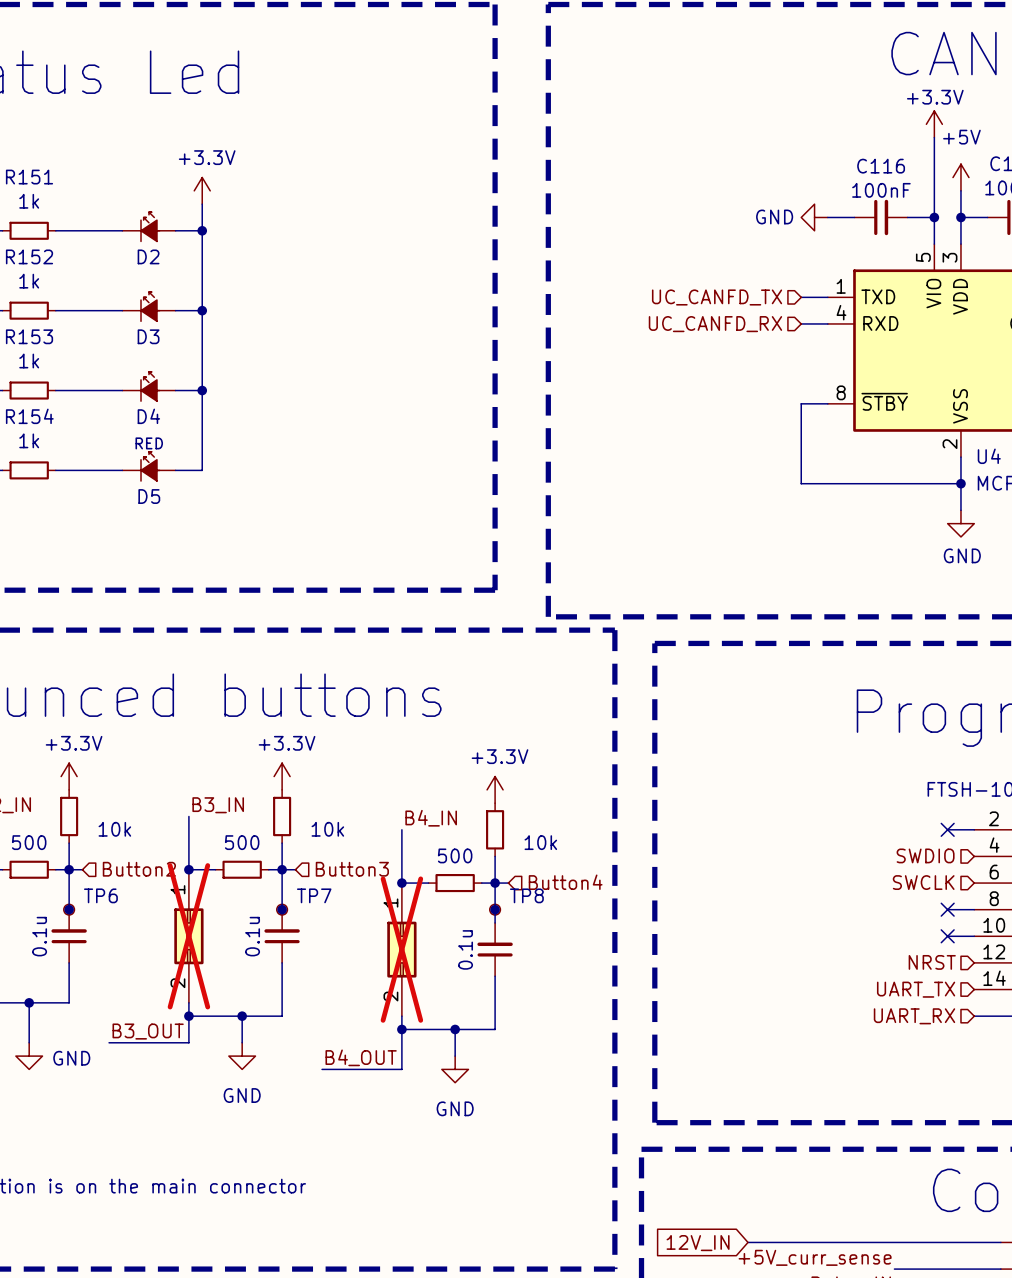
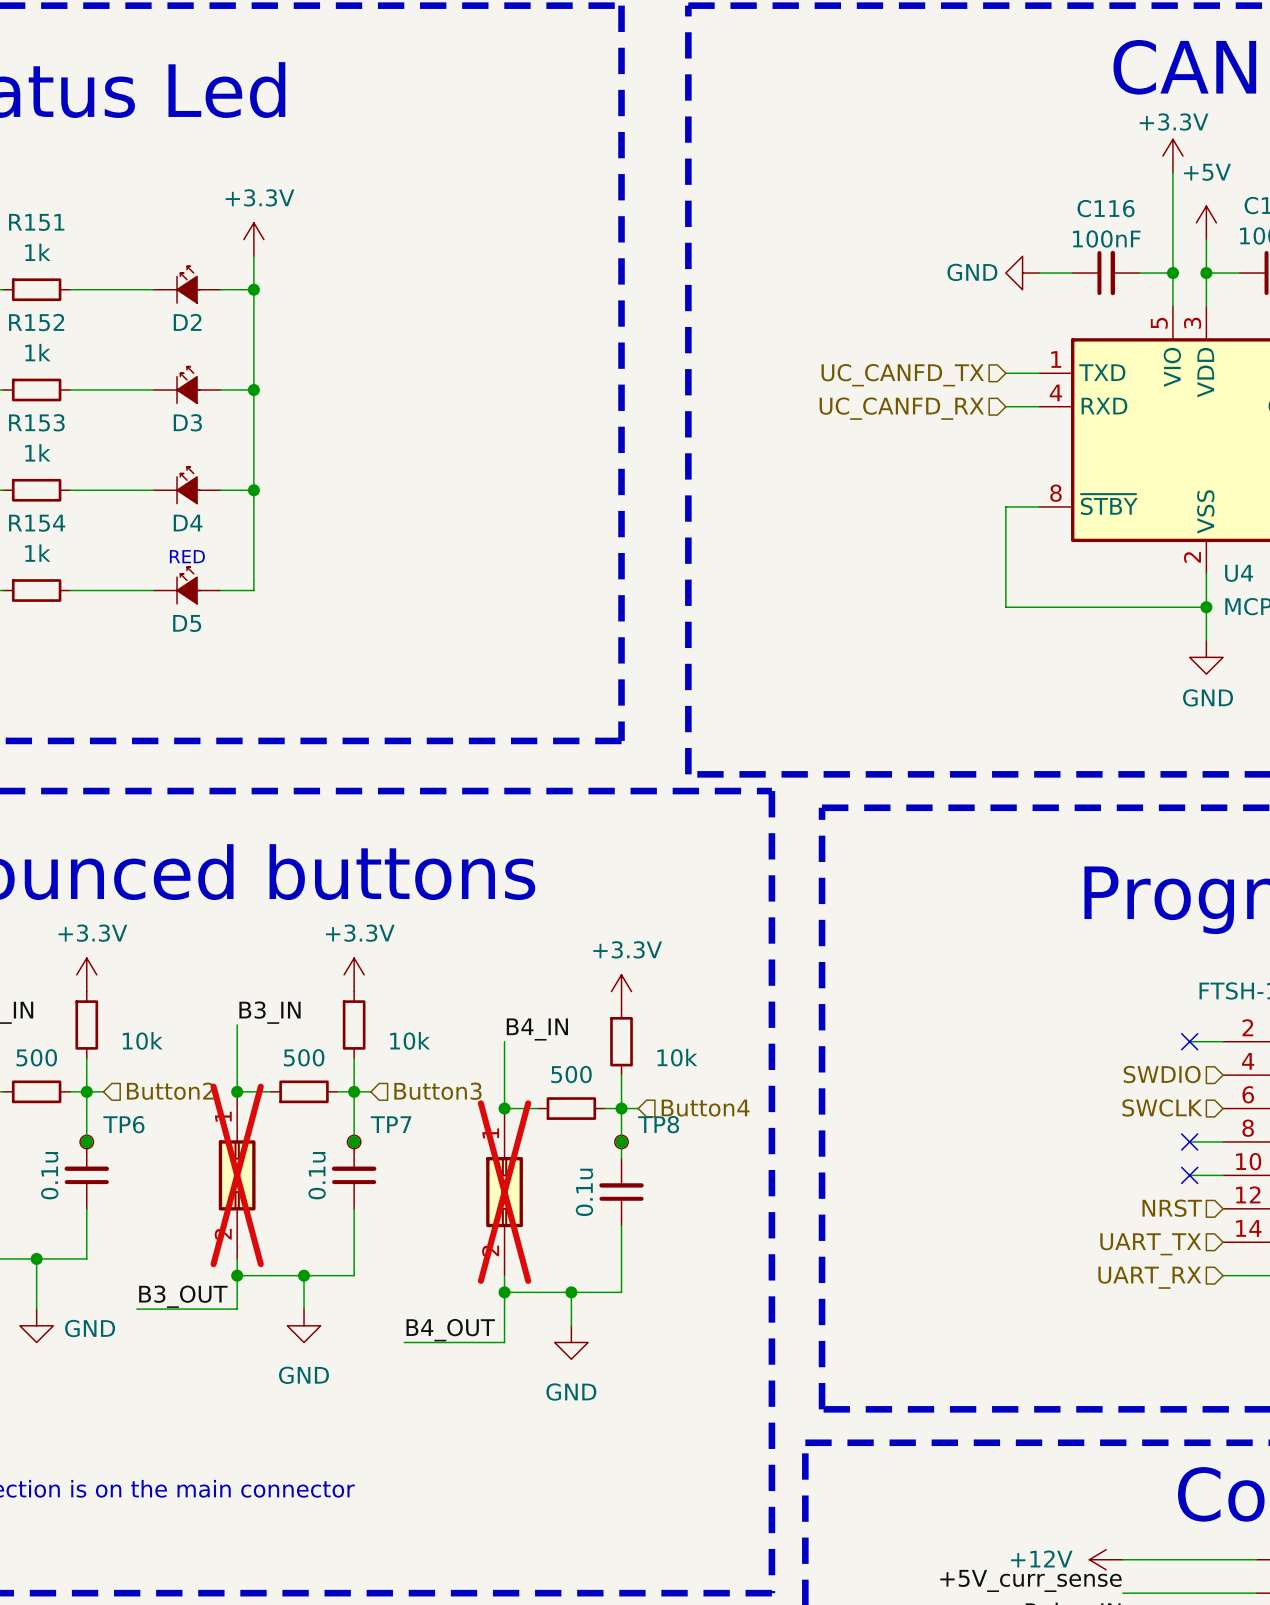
wire: (748, 1242) (894, 1242) -> none
power symbol: none -> +12V (1106, 1559)
global label: 12V_IN (698, 1243) -> none

